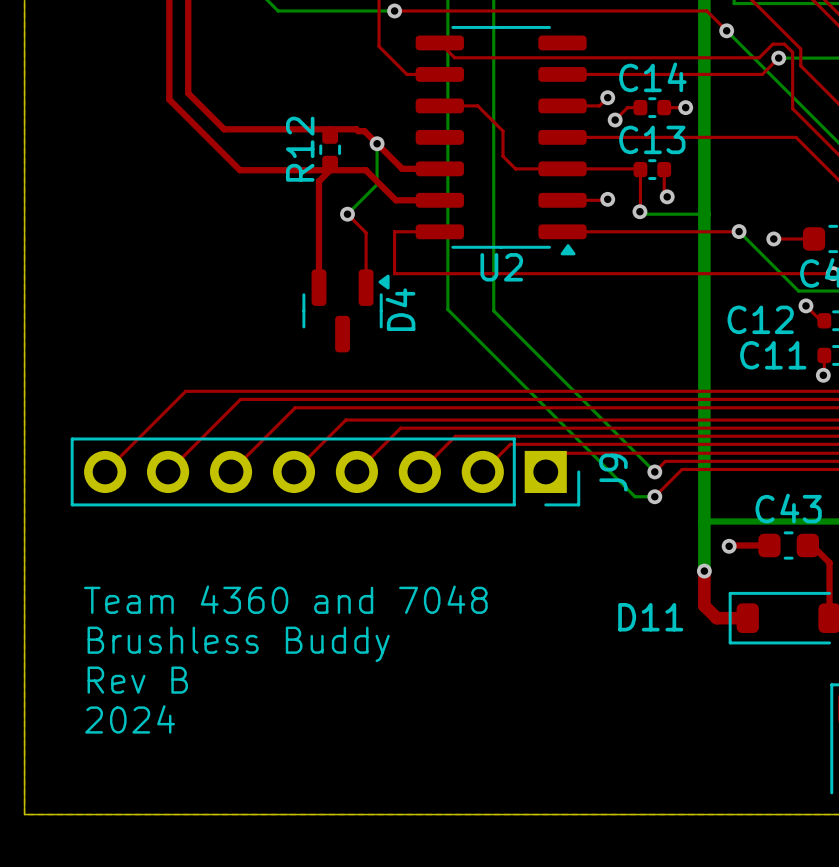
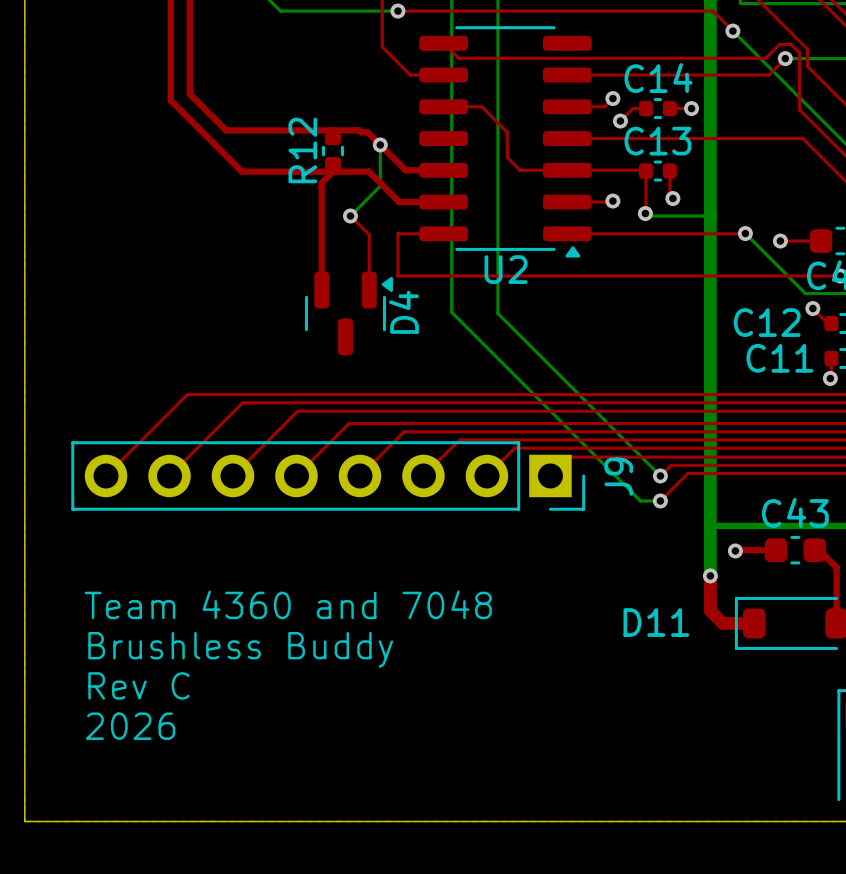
text: Rev B (137, 680) -> Rev C (138, 685)
text: 2024 (130, 719) -> 2026 (130, 726)

